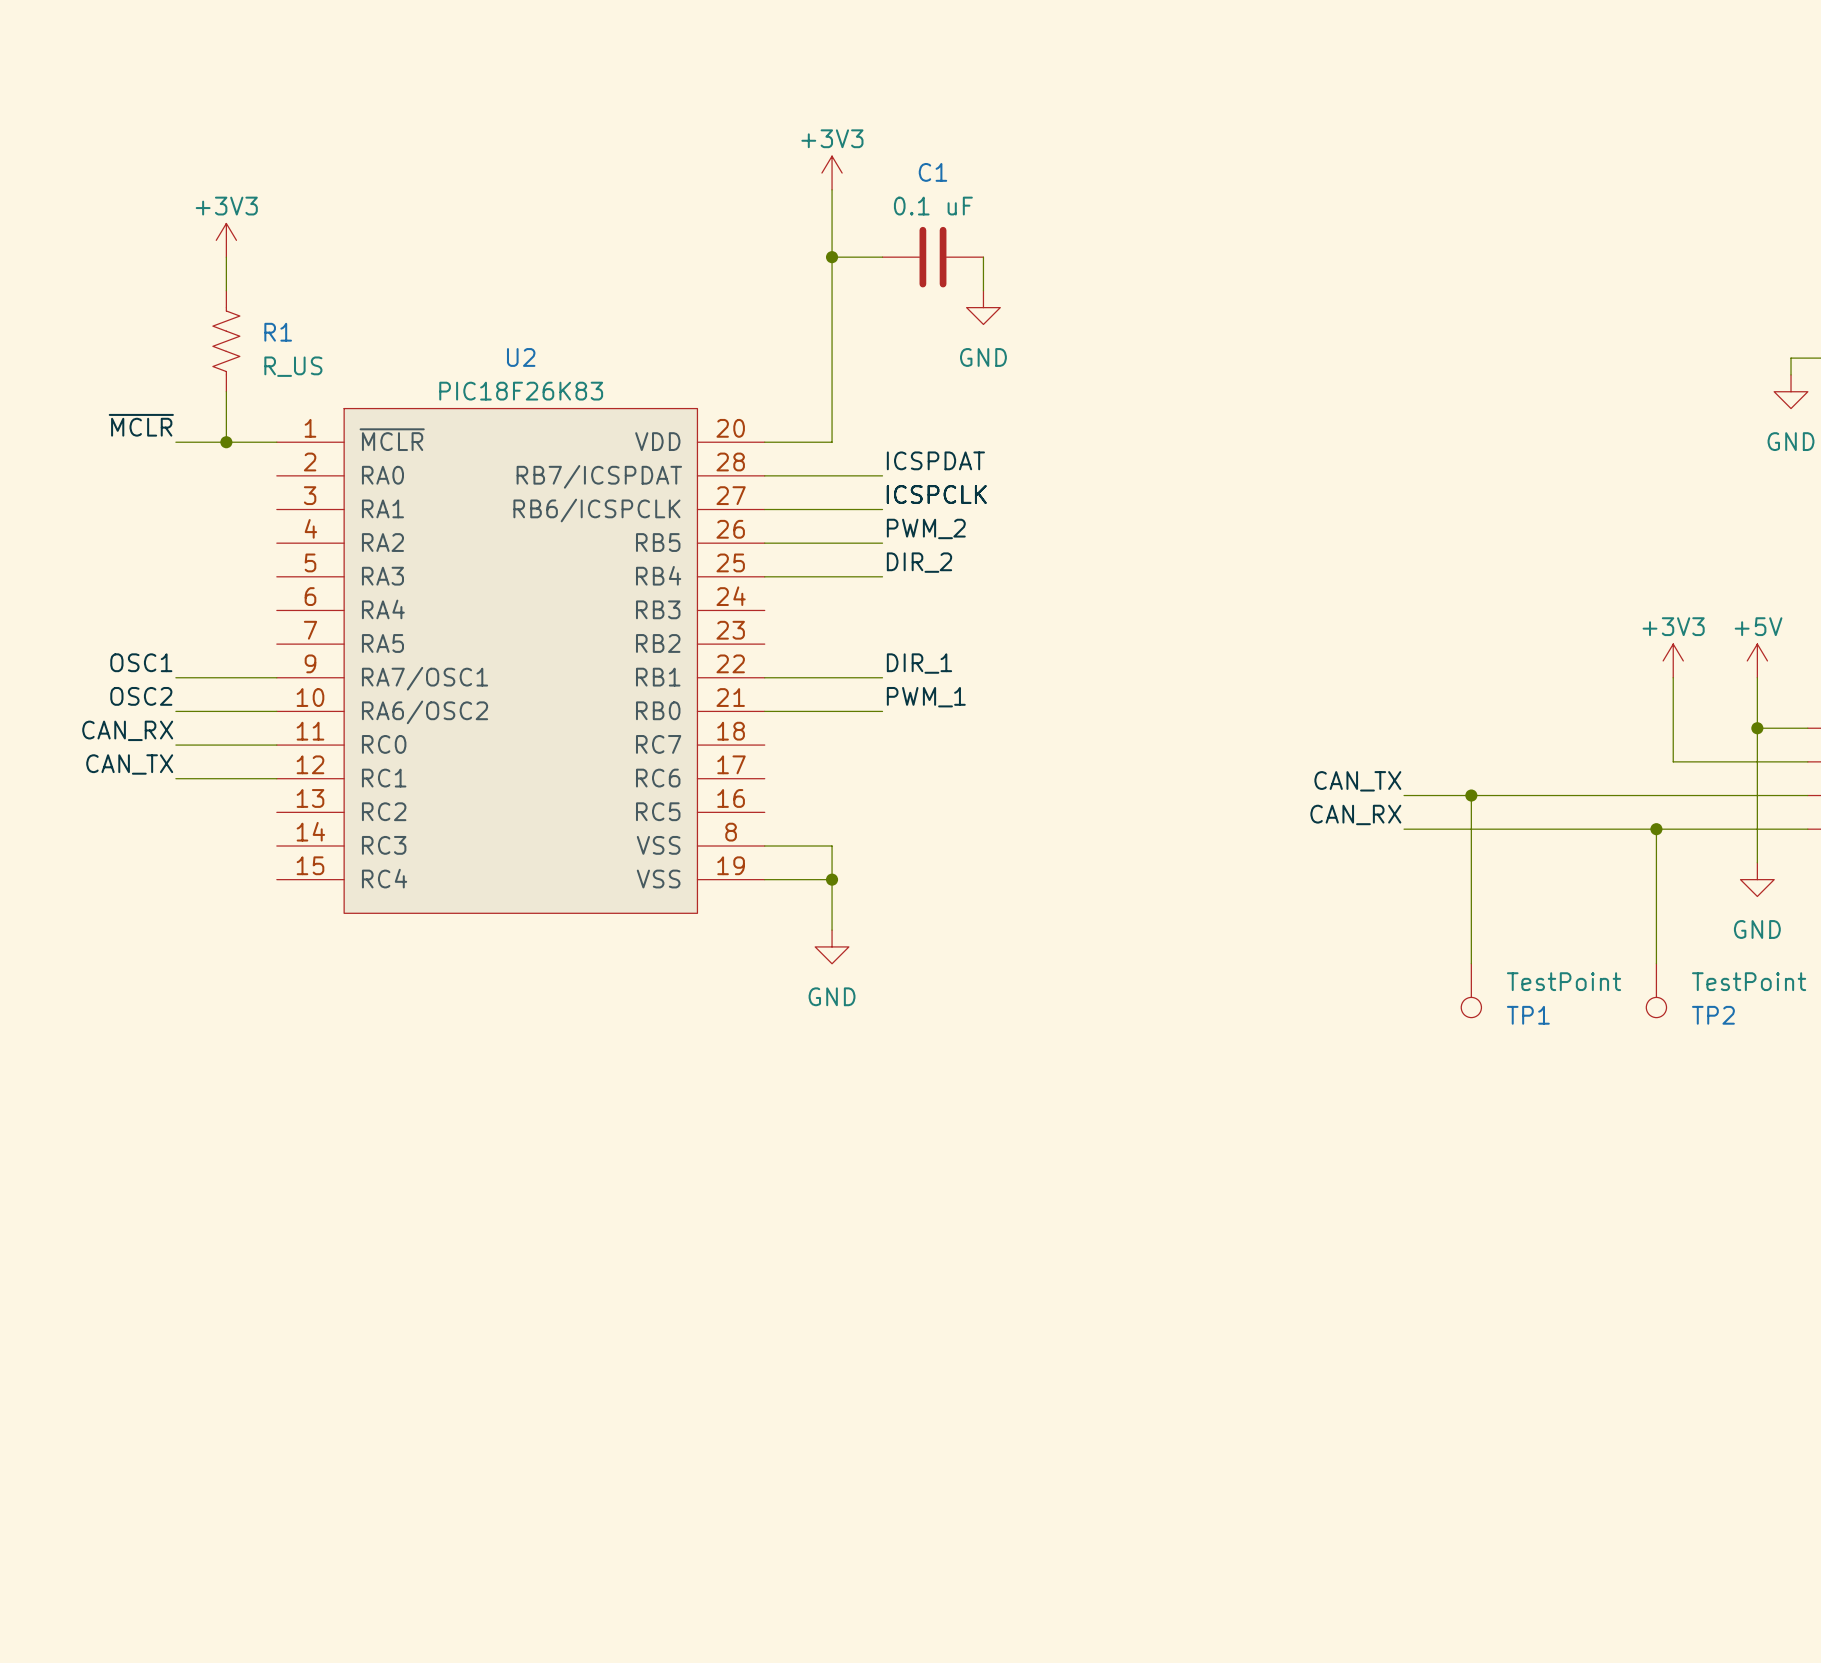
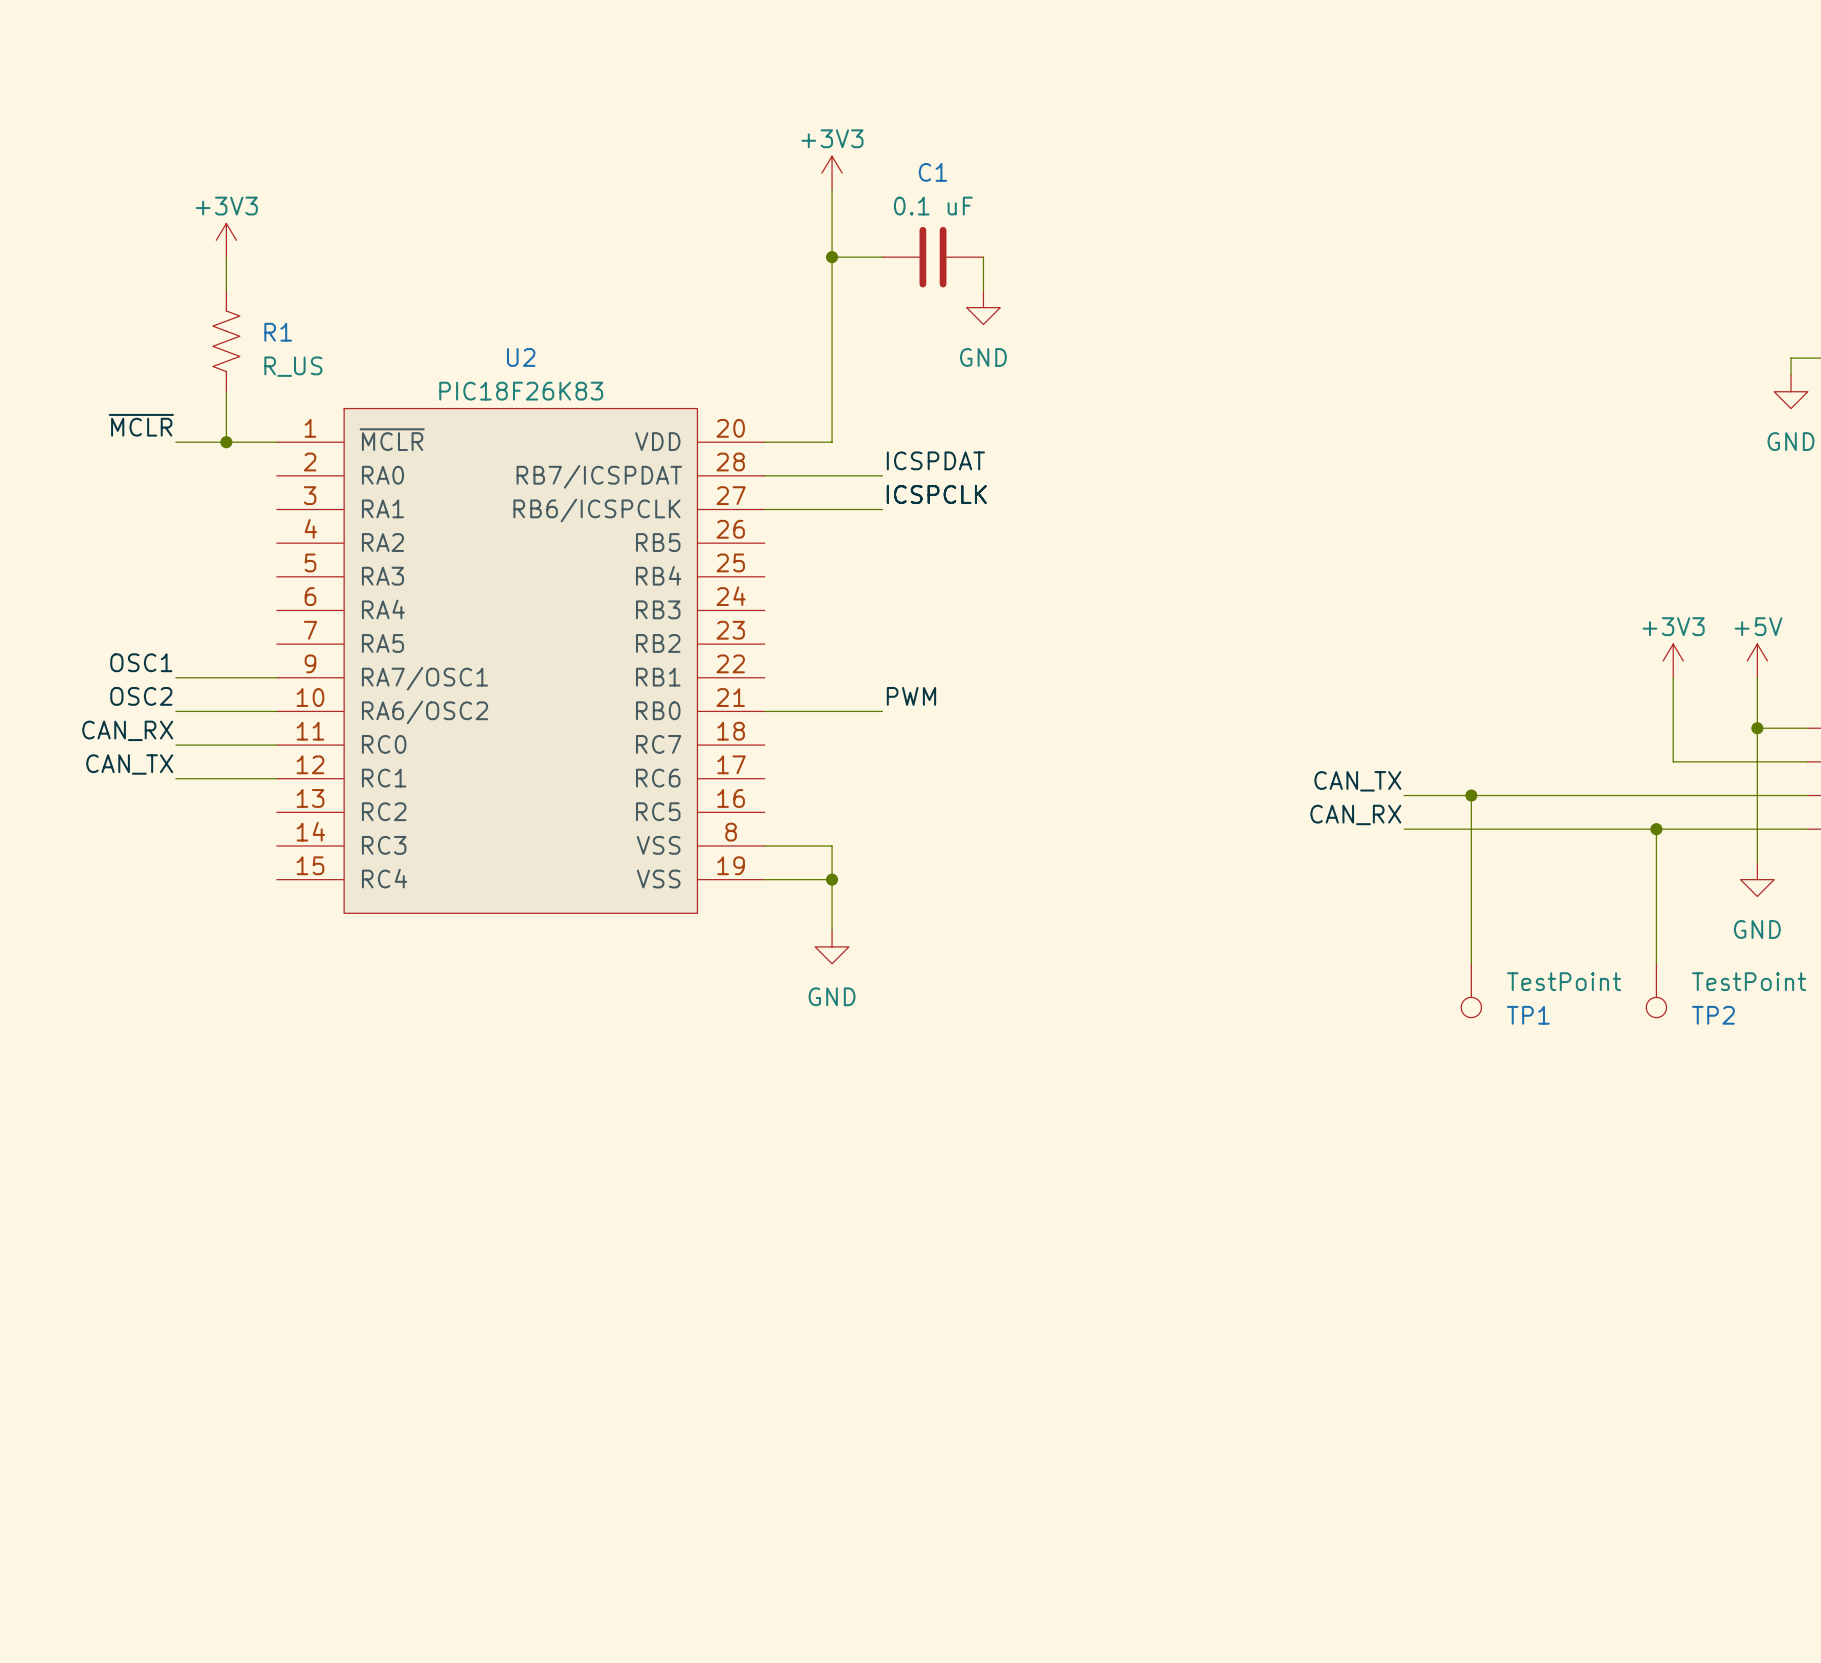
label: PWM_2 (926, 528) -> none
wire: (764, 543) (882, 543) -> none
label: DIR_2 (919, 562) -> none
wire: (764, 576) (882, 576) -> none
label: DIR_1 (919, 663) -> none
wire: (764, 677) (882, 677) -> none
label: PWM_1 (926, 697) -> PWM (911, 696)

